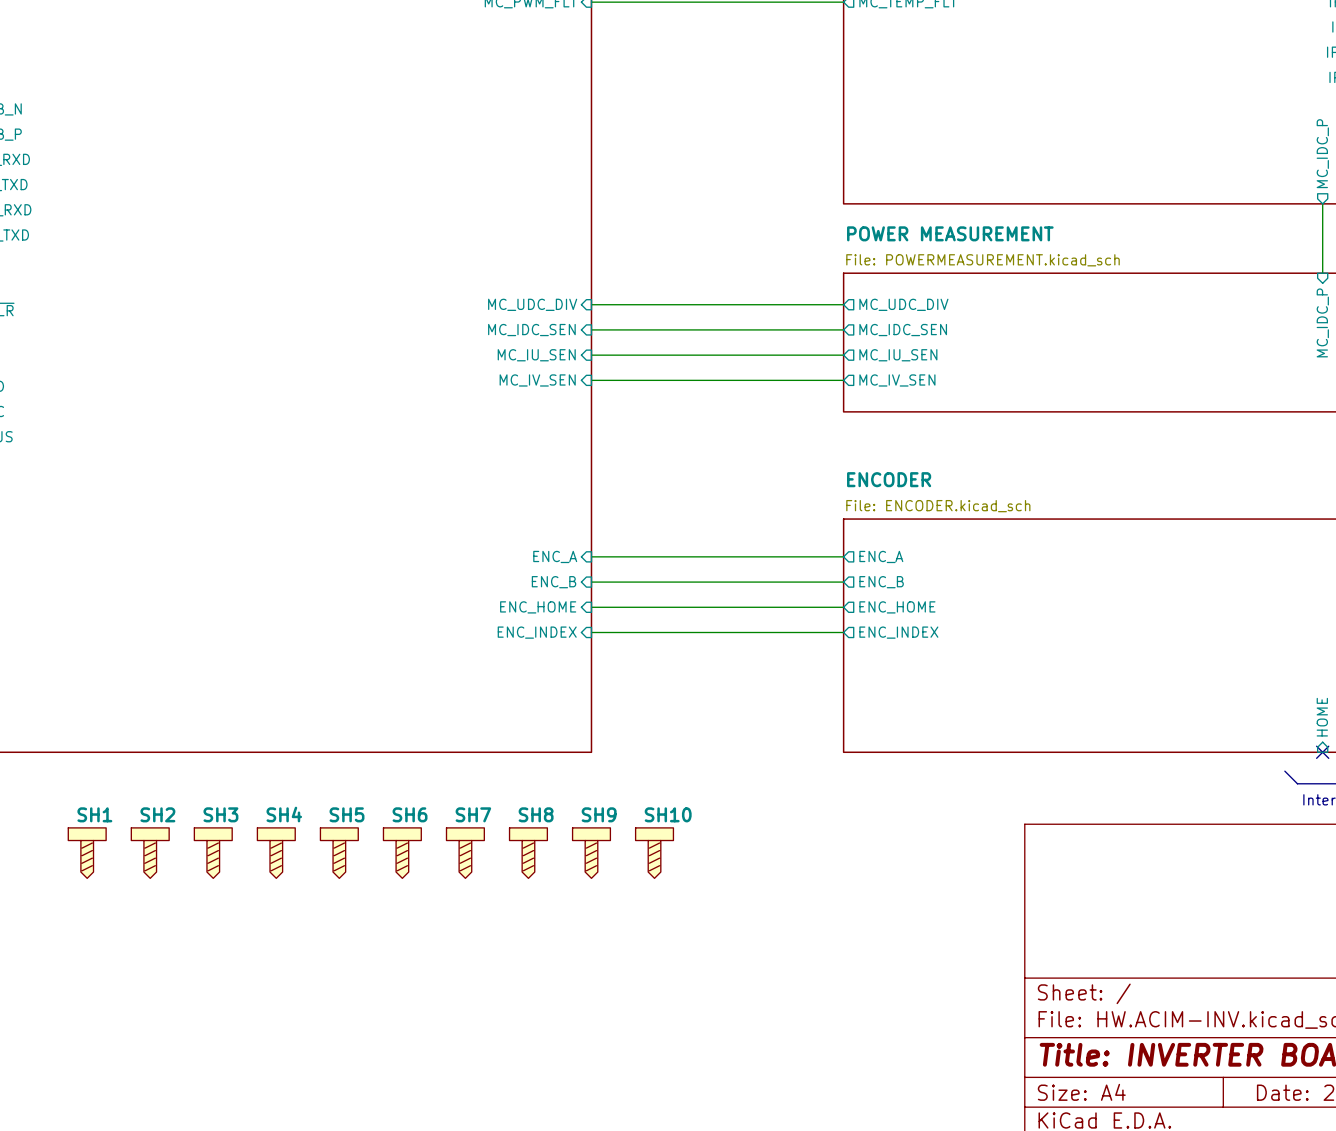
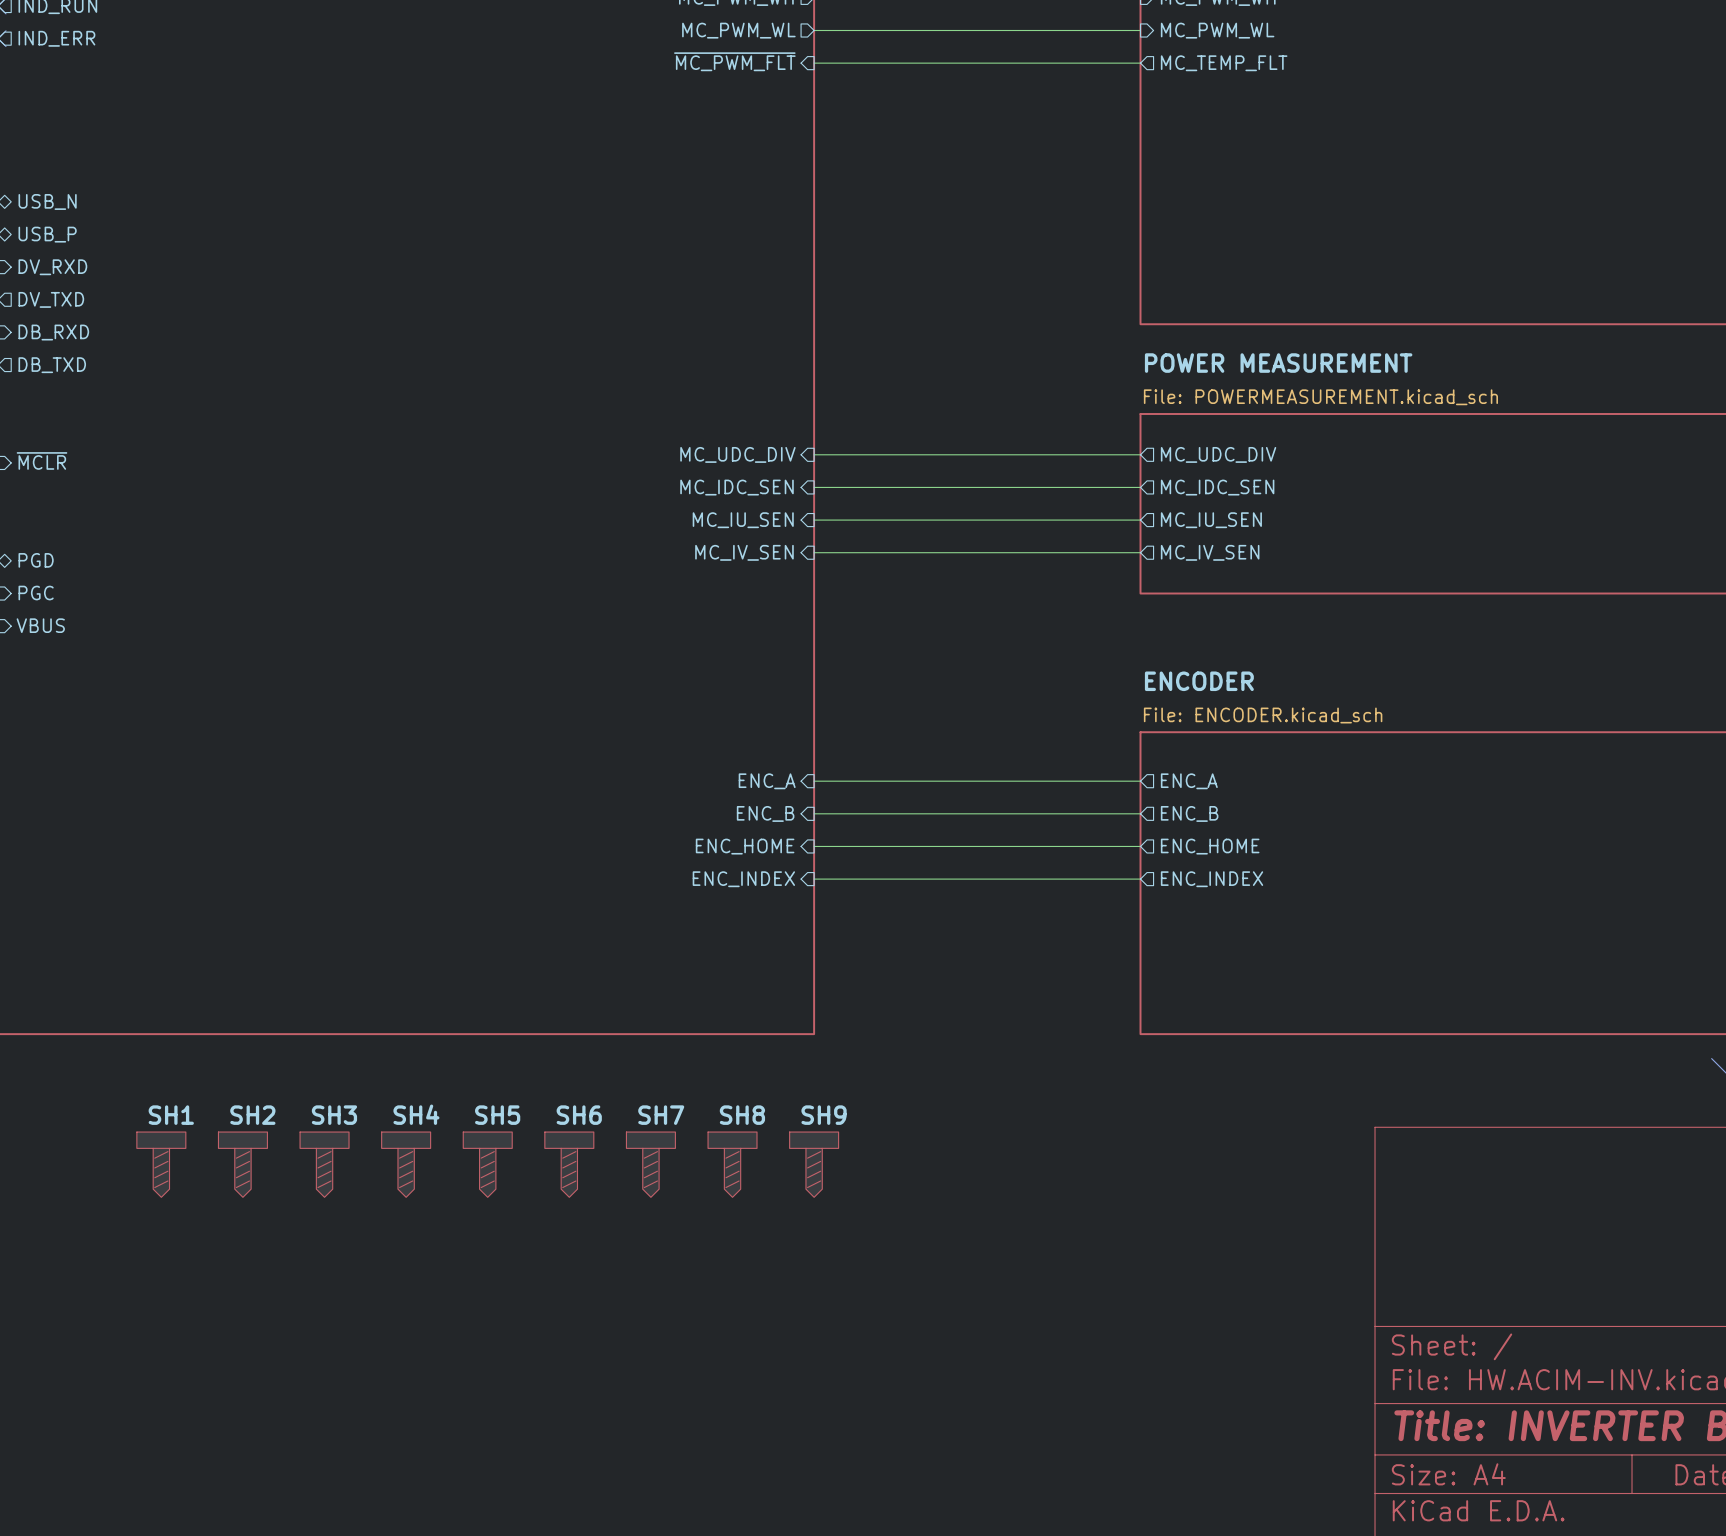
SH10: (654, 853) -> none

